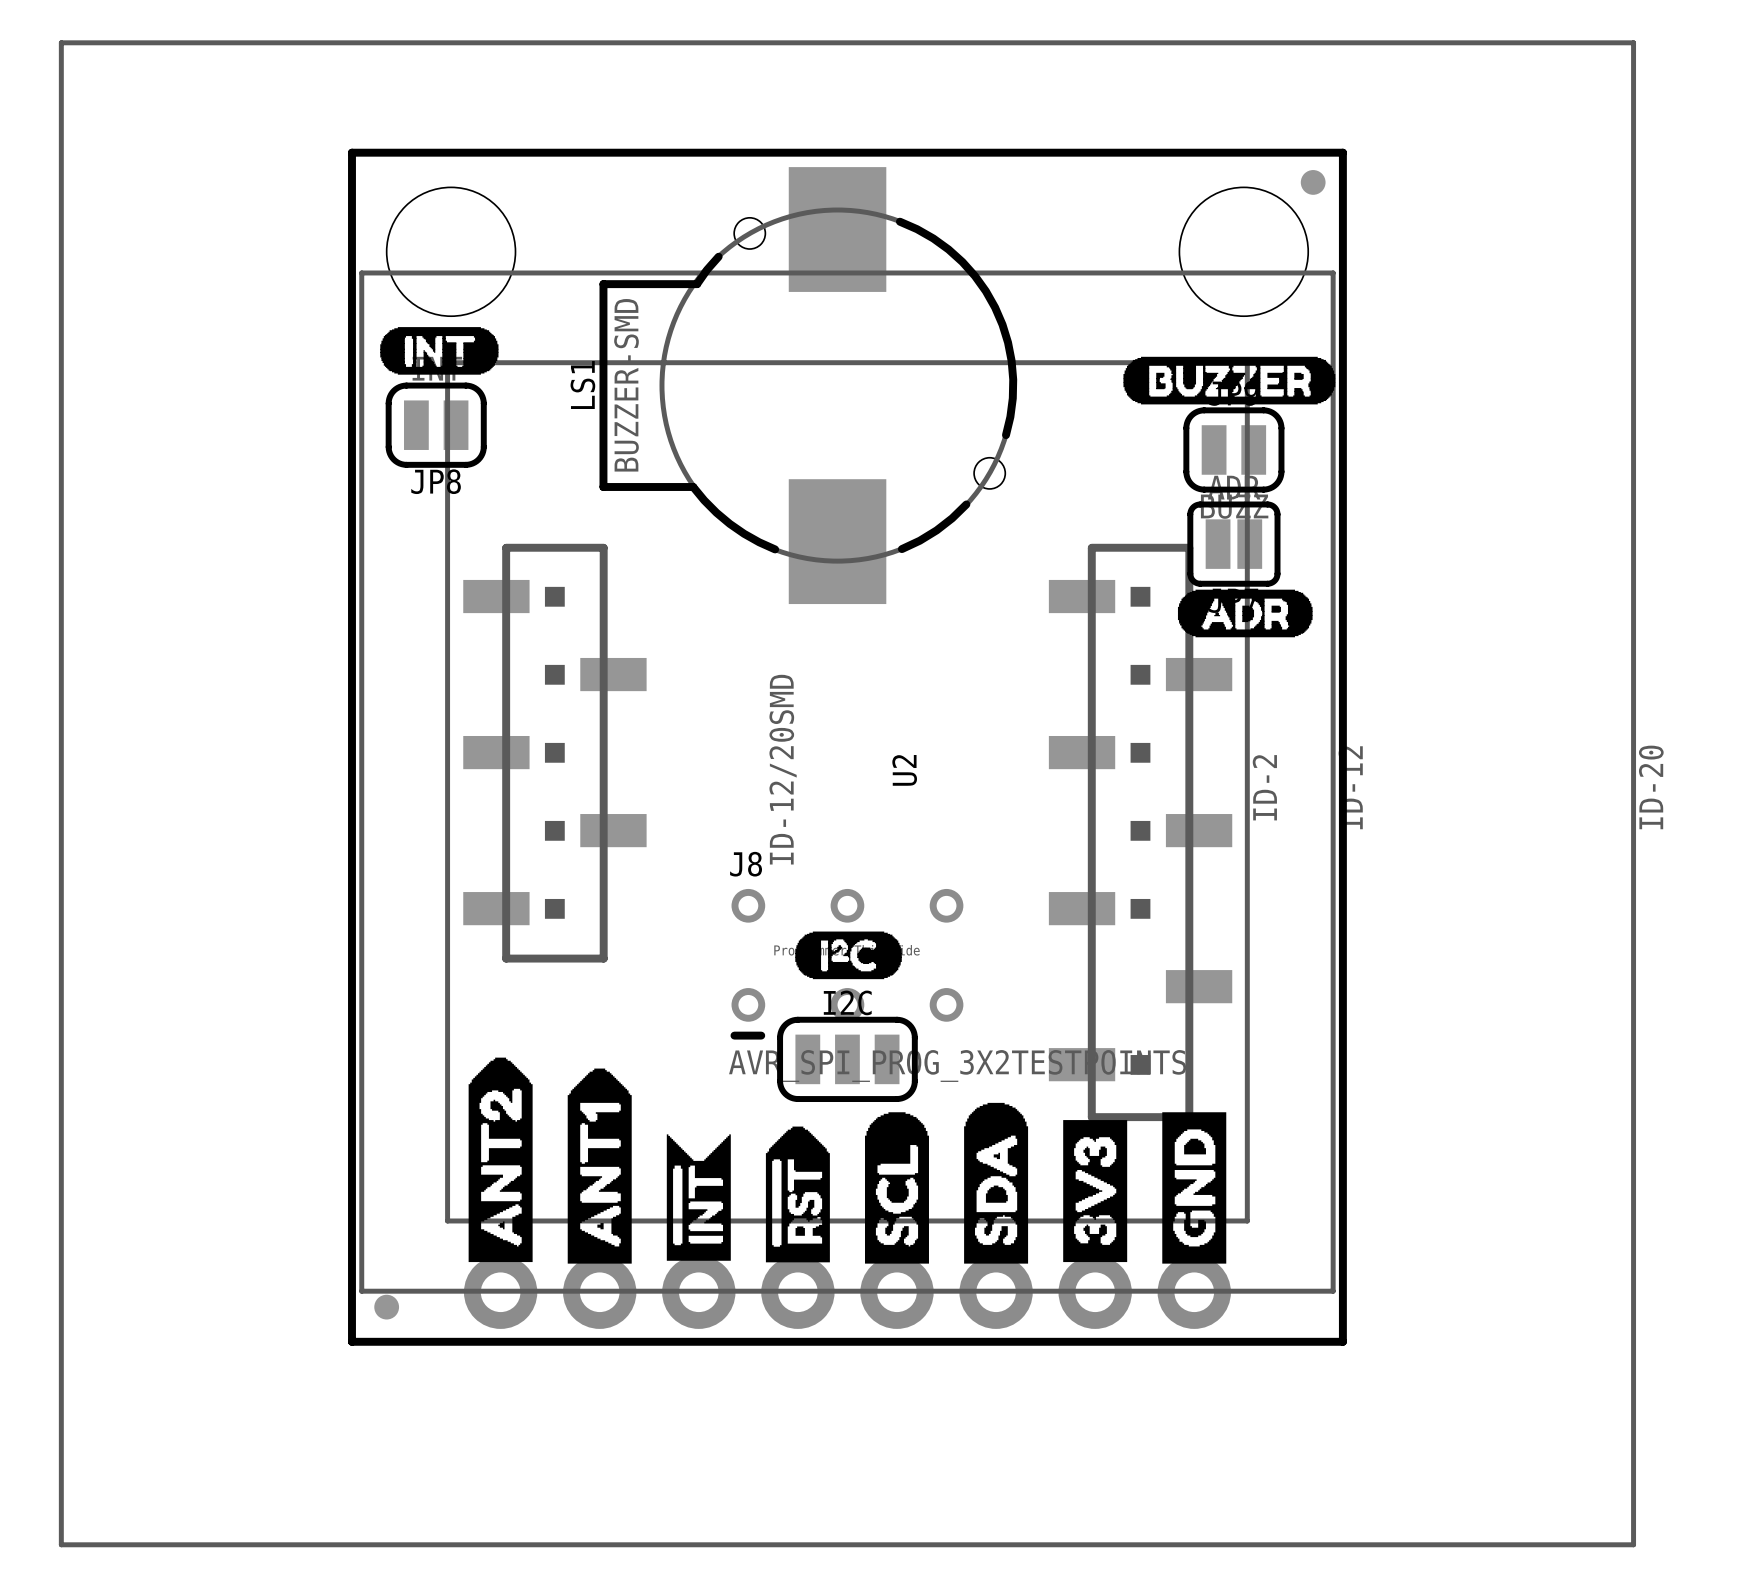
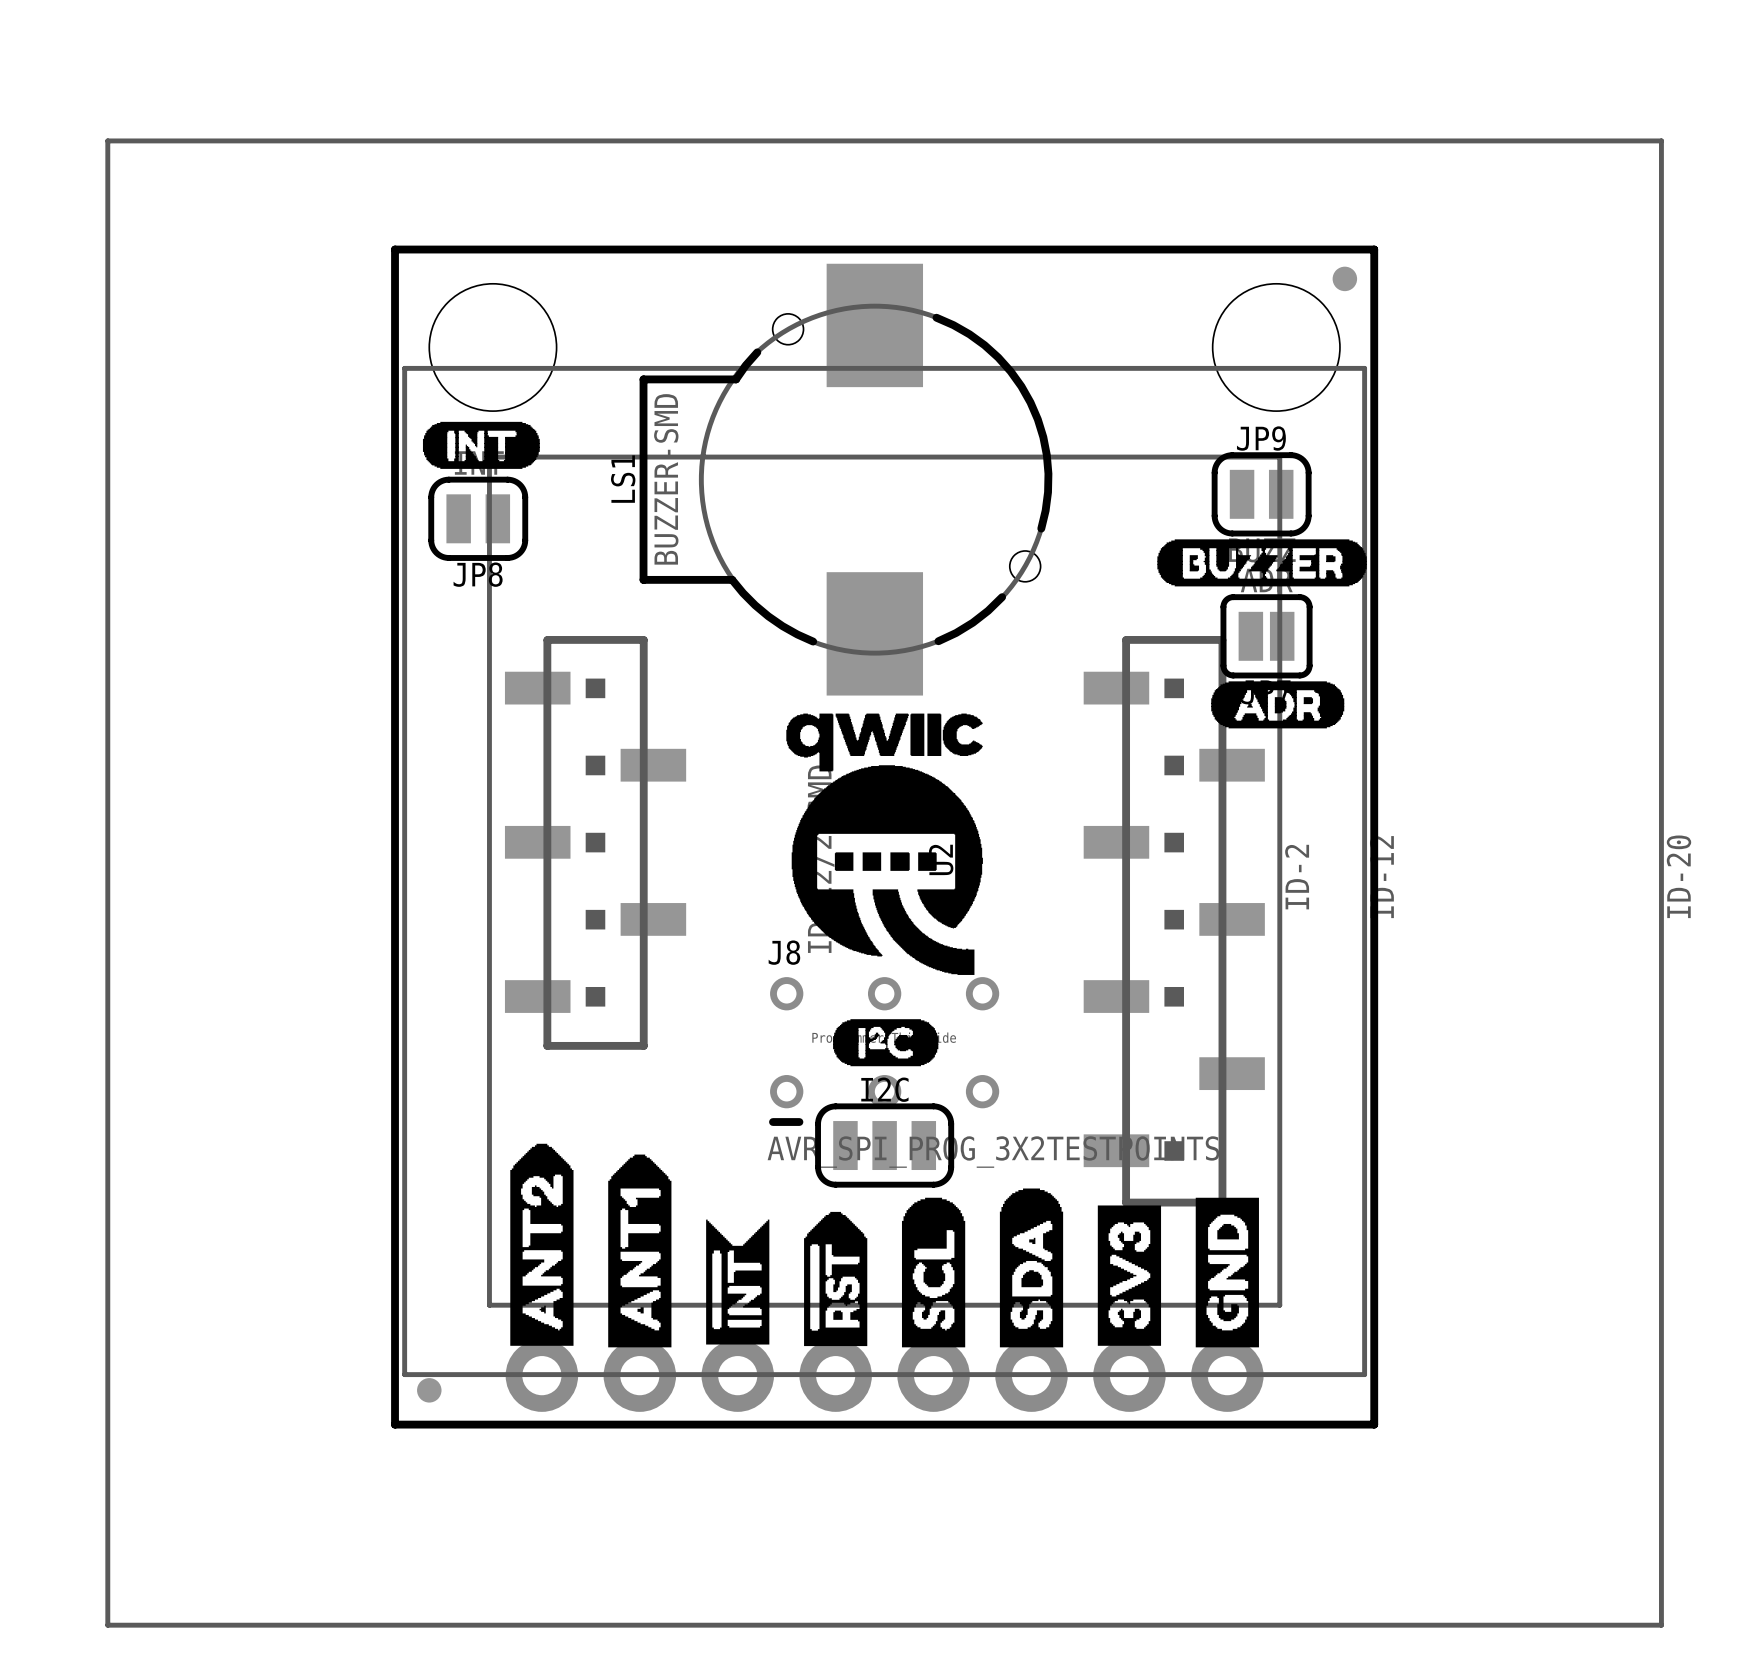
drawing position: (1229, 380) -> (1262, 562)
JP9 position: (1233, 449) -> (1261, 494)
drawing: none -> [786, 713, 983, 975]

